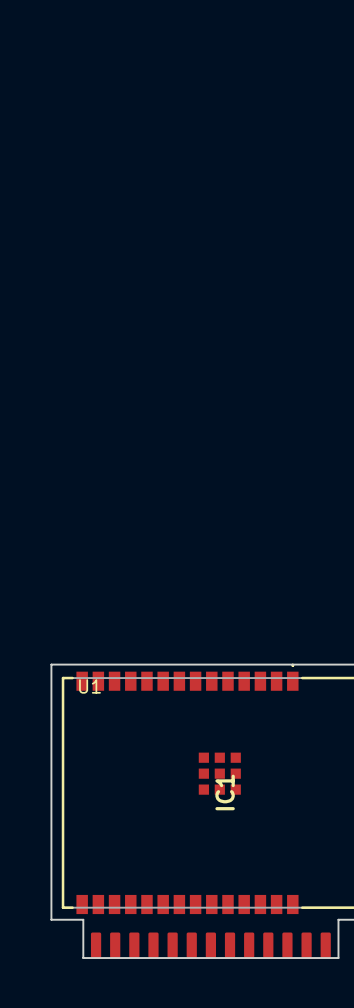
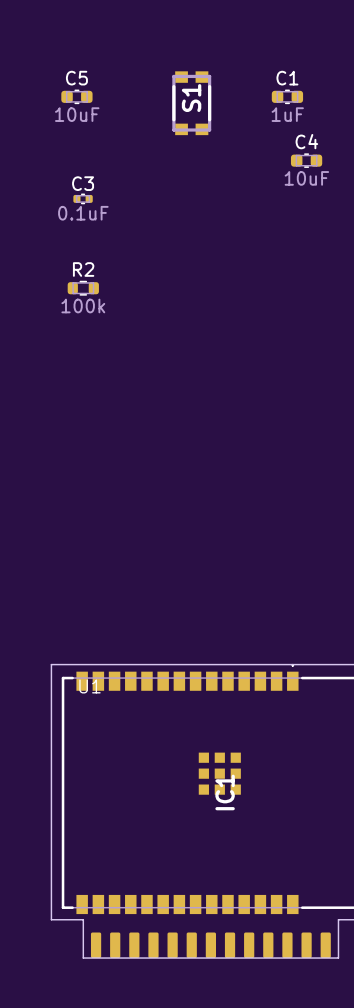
C5: none -> 10uF (76, 96)
C1: none -> 1uF (287, 96)
S1: none -> (191, 103)
C4: none -> 10uF (306, 160)
C3: none -> 0.1uF (83, 198)
R2: none -> 100k (83, 288)

